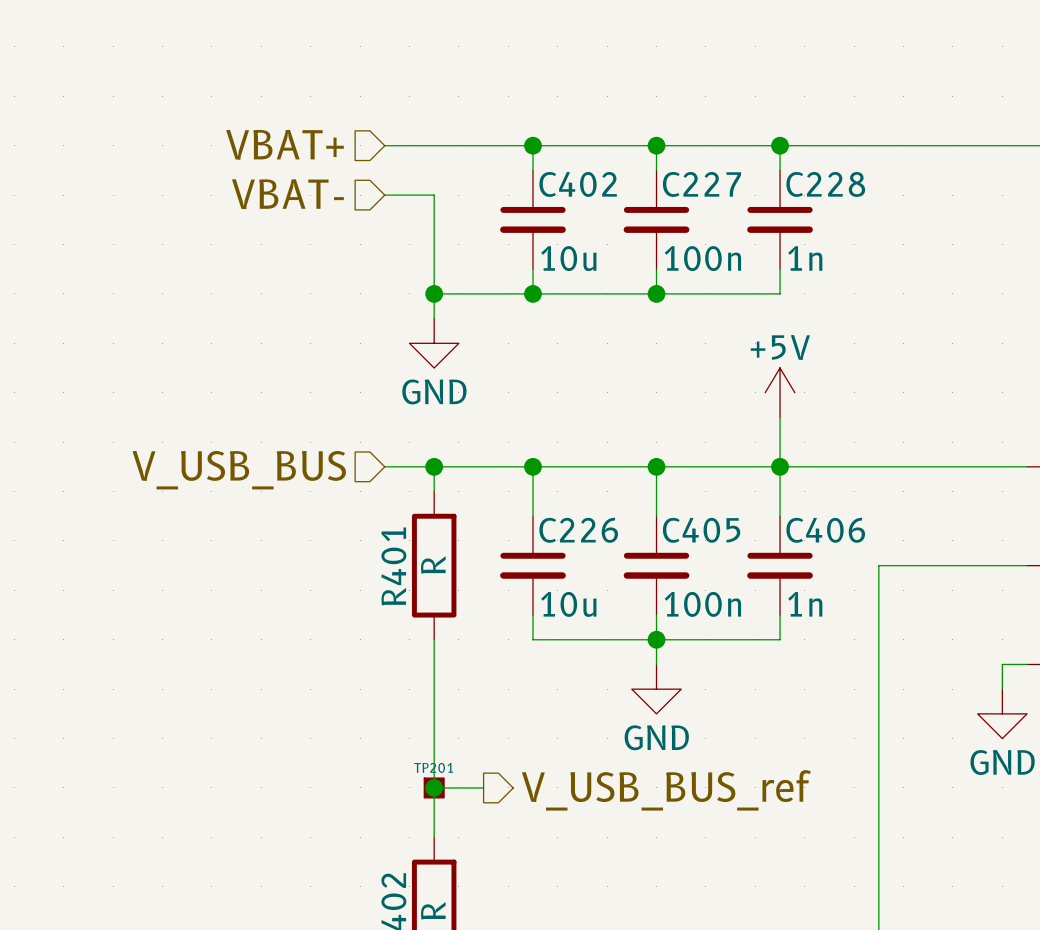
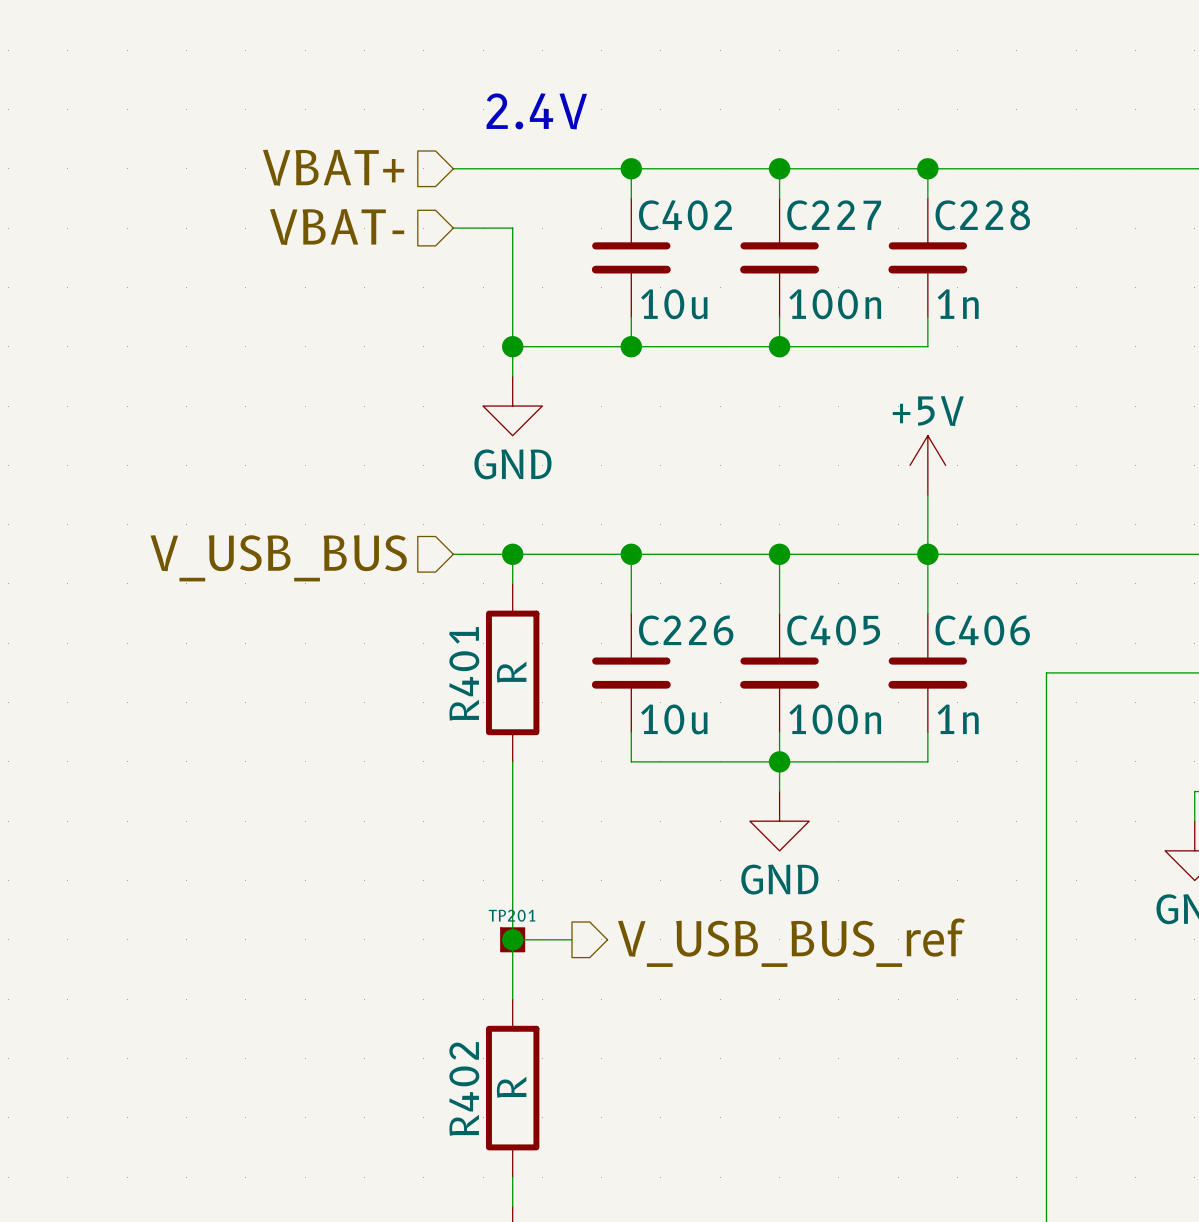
text: none -> 2.4V (536, 111)

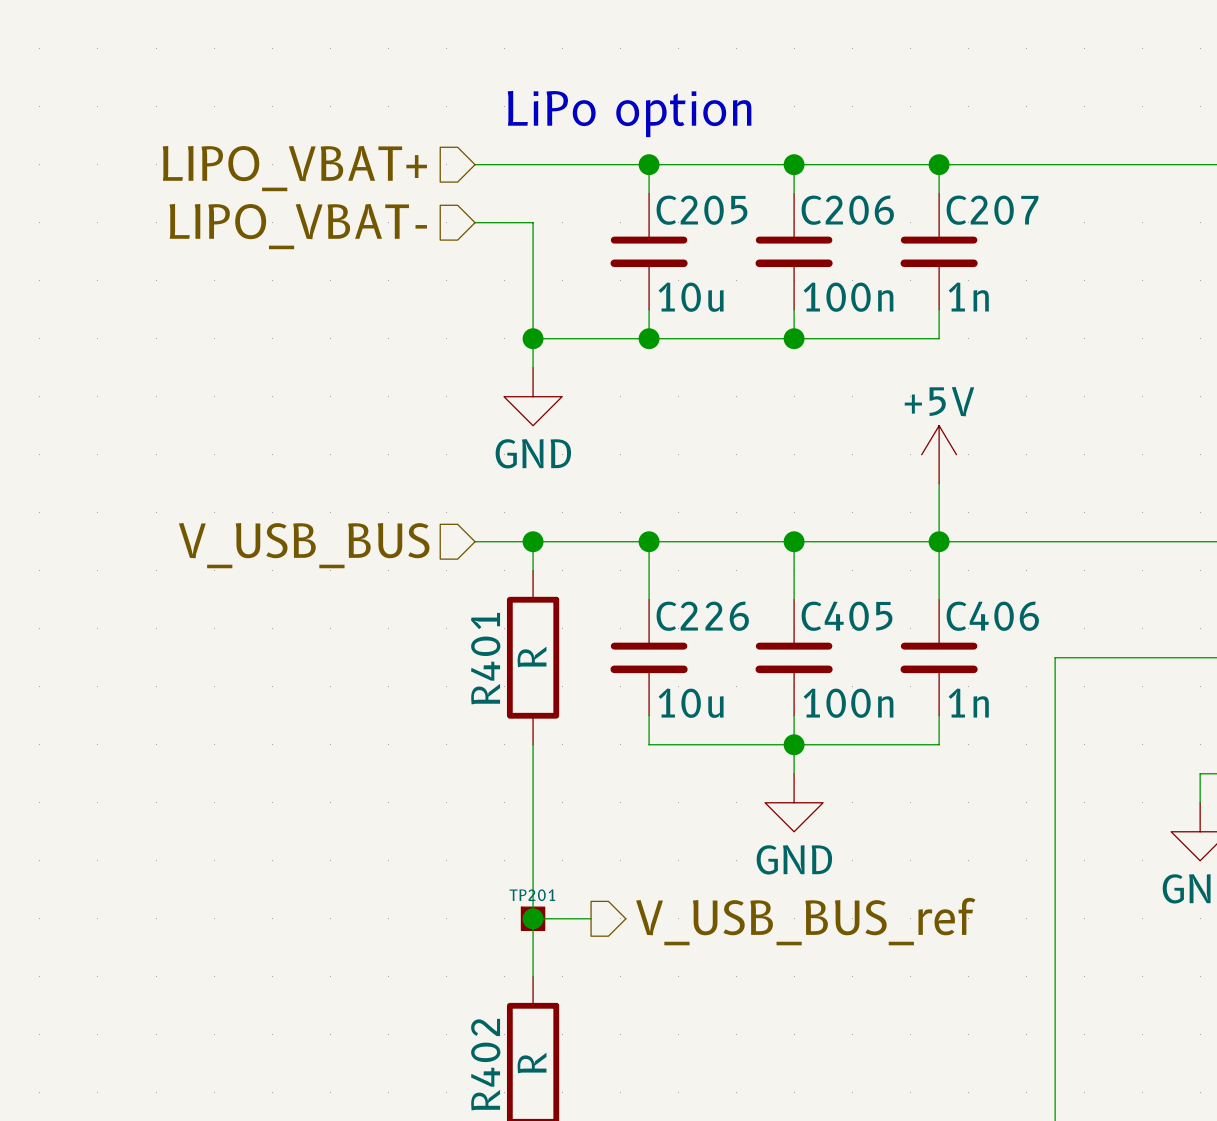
text: 2.4V (536, 111) -> LiPo option (629, 114)
hierarchical label: VBAT+ (333, 167) -> LIPO_VBAT+ (294, 168)
C402 name: C402 (685, 215) -> C205 (701, 210)
C227 name: C227 (834, 215) -> C206 (847, 210)
C228 name: C228 (982, 215) -> C207 (992, 210)
hierarchical label: VBAT- (337, 226) -> LIPO_VBAT- (298, 226)

